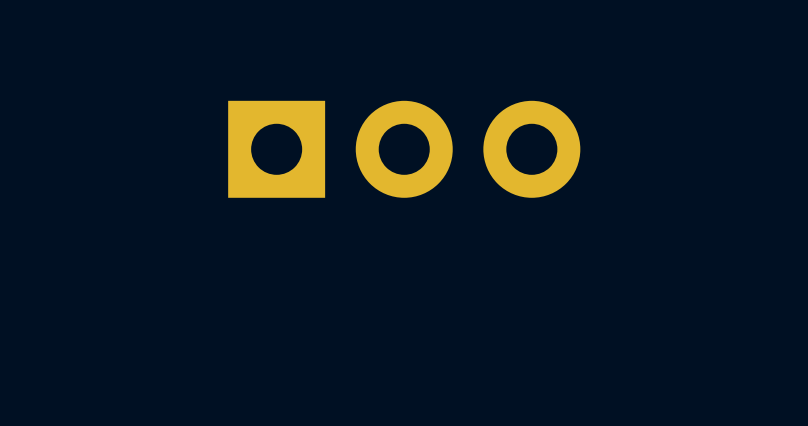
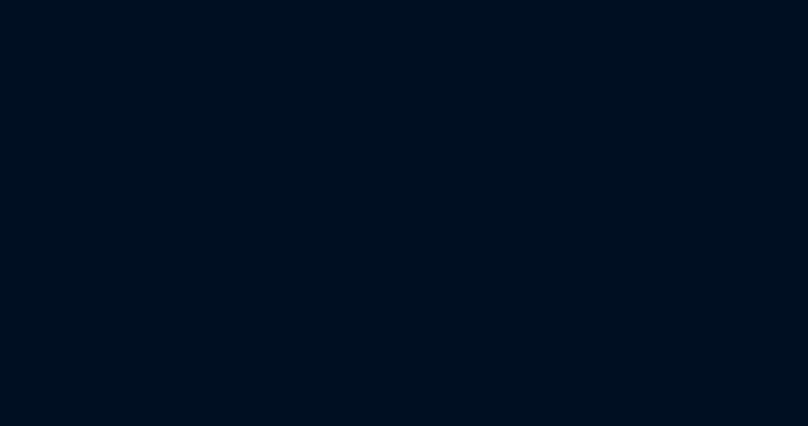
part: (404, 149) -> none

